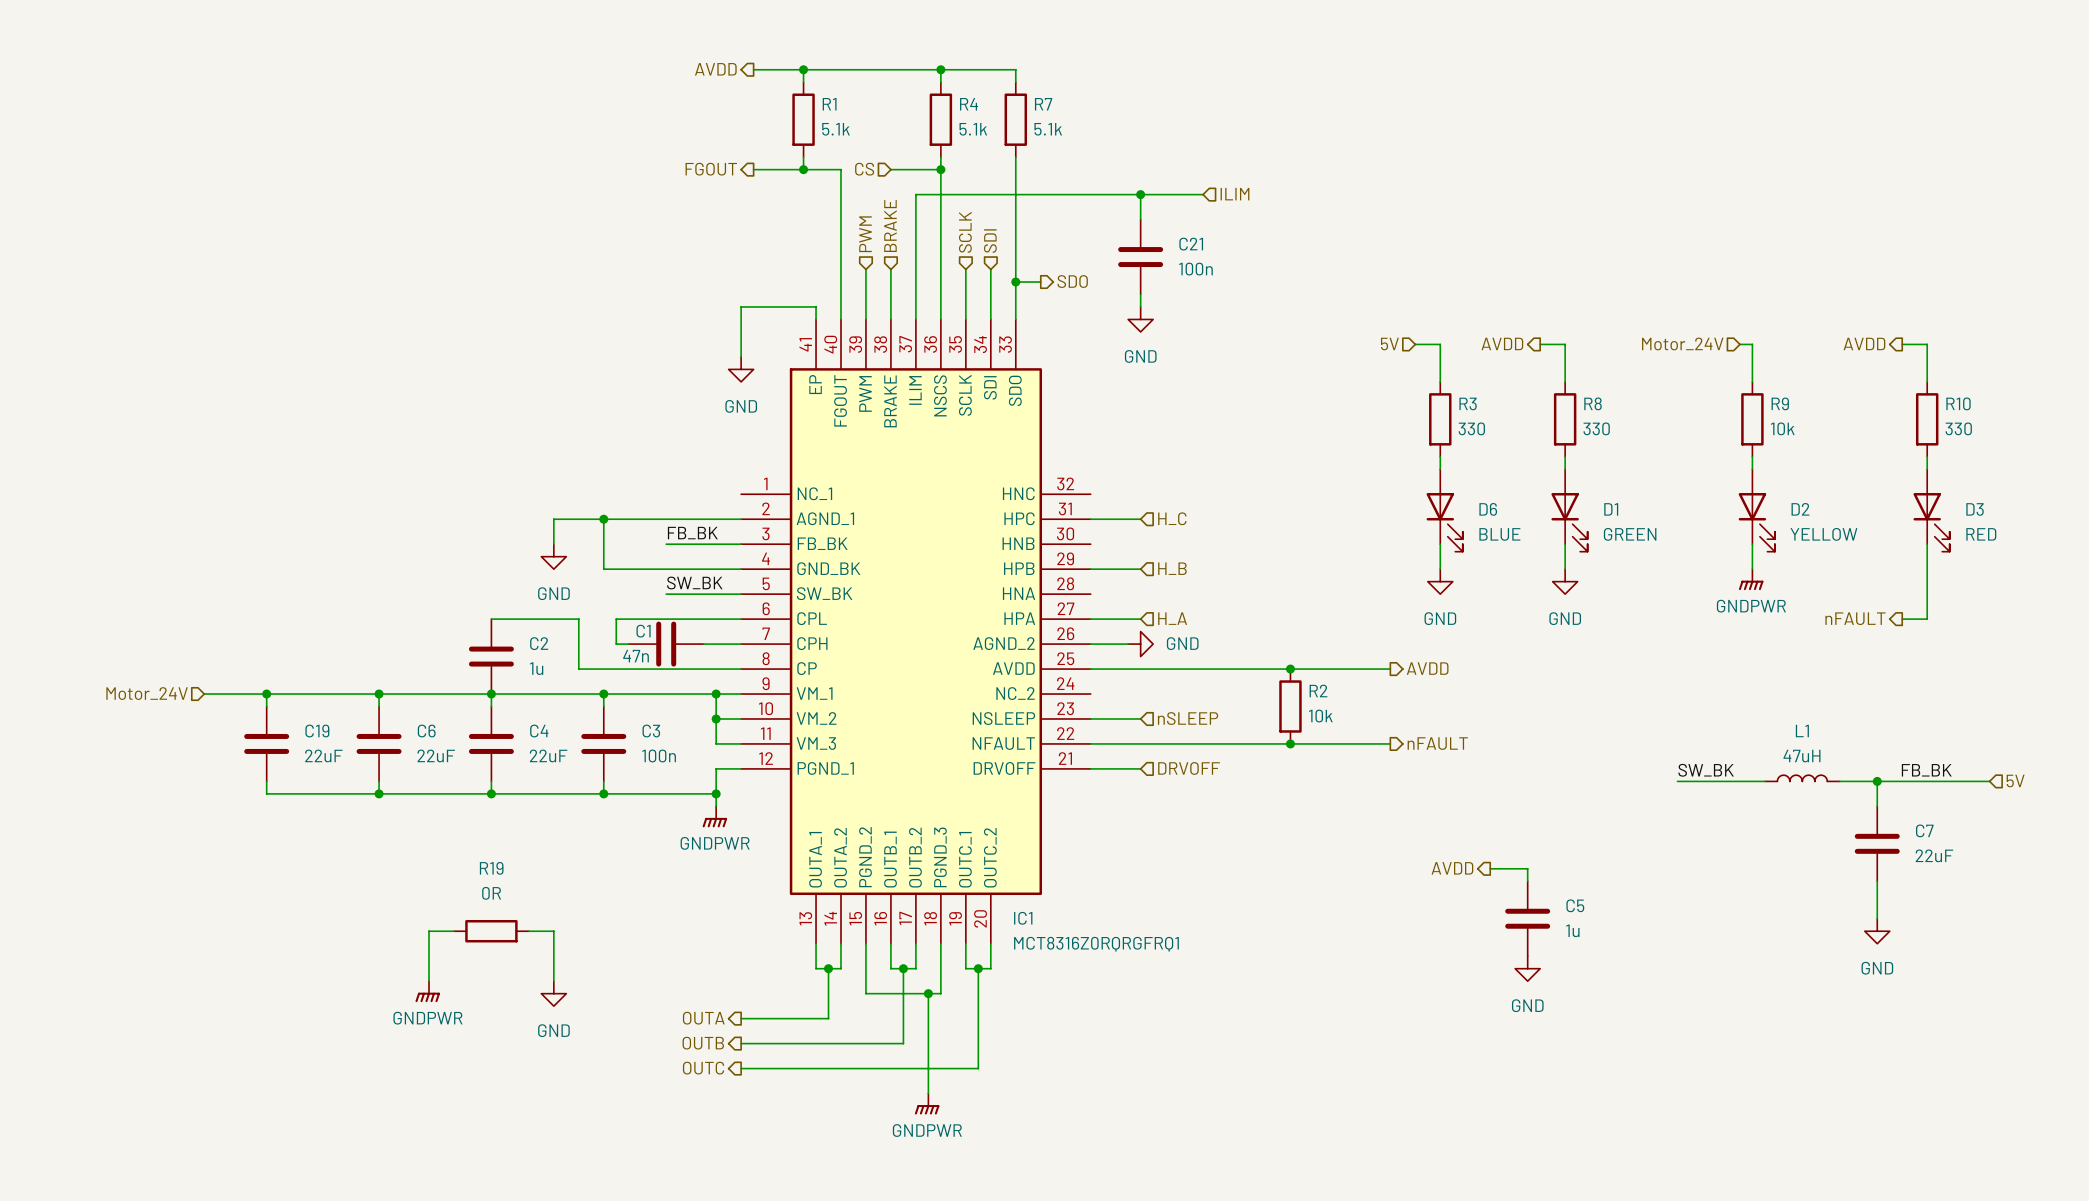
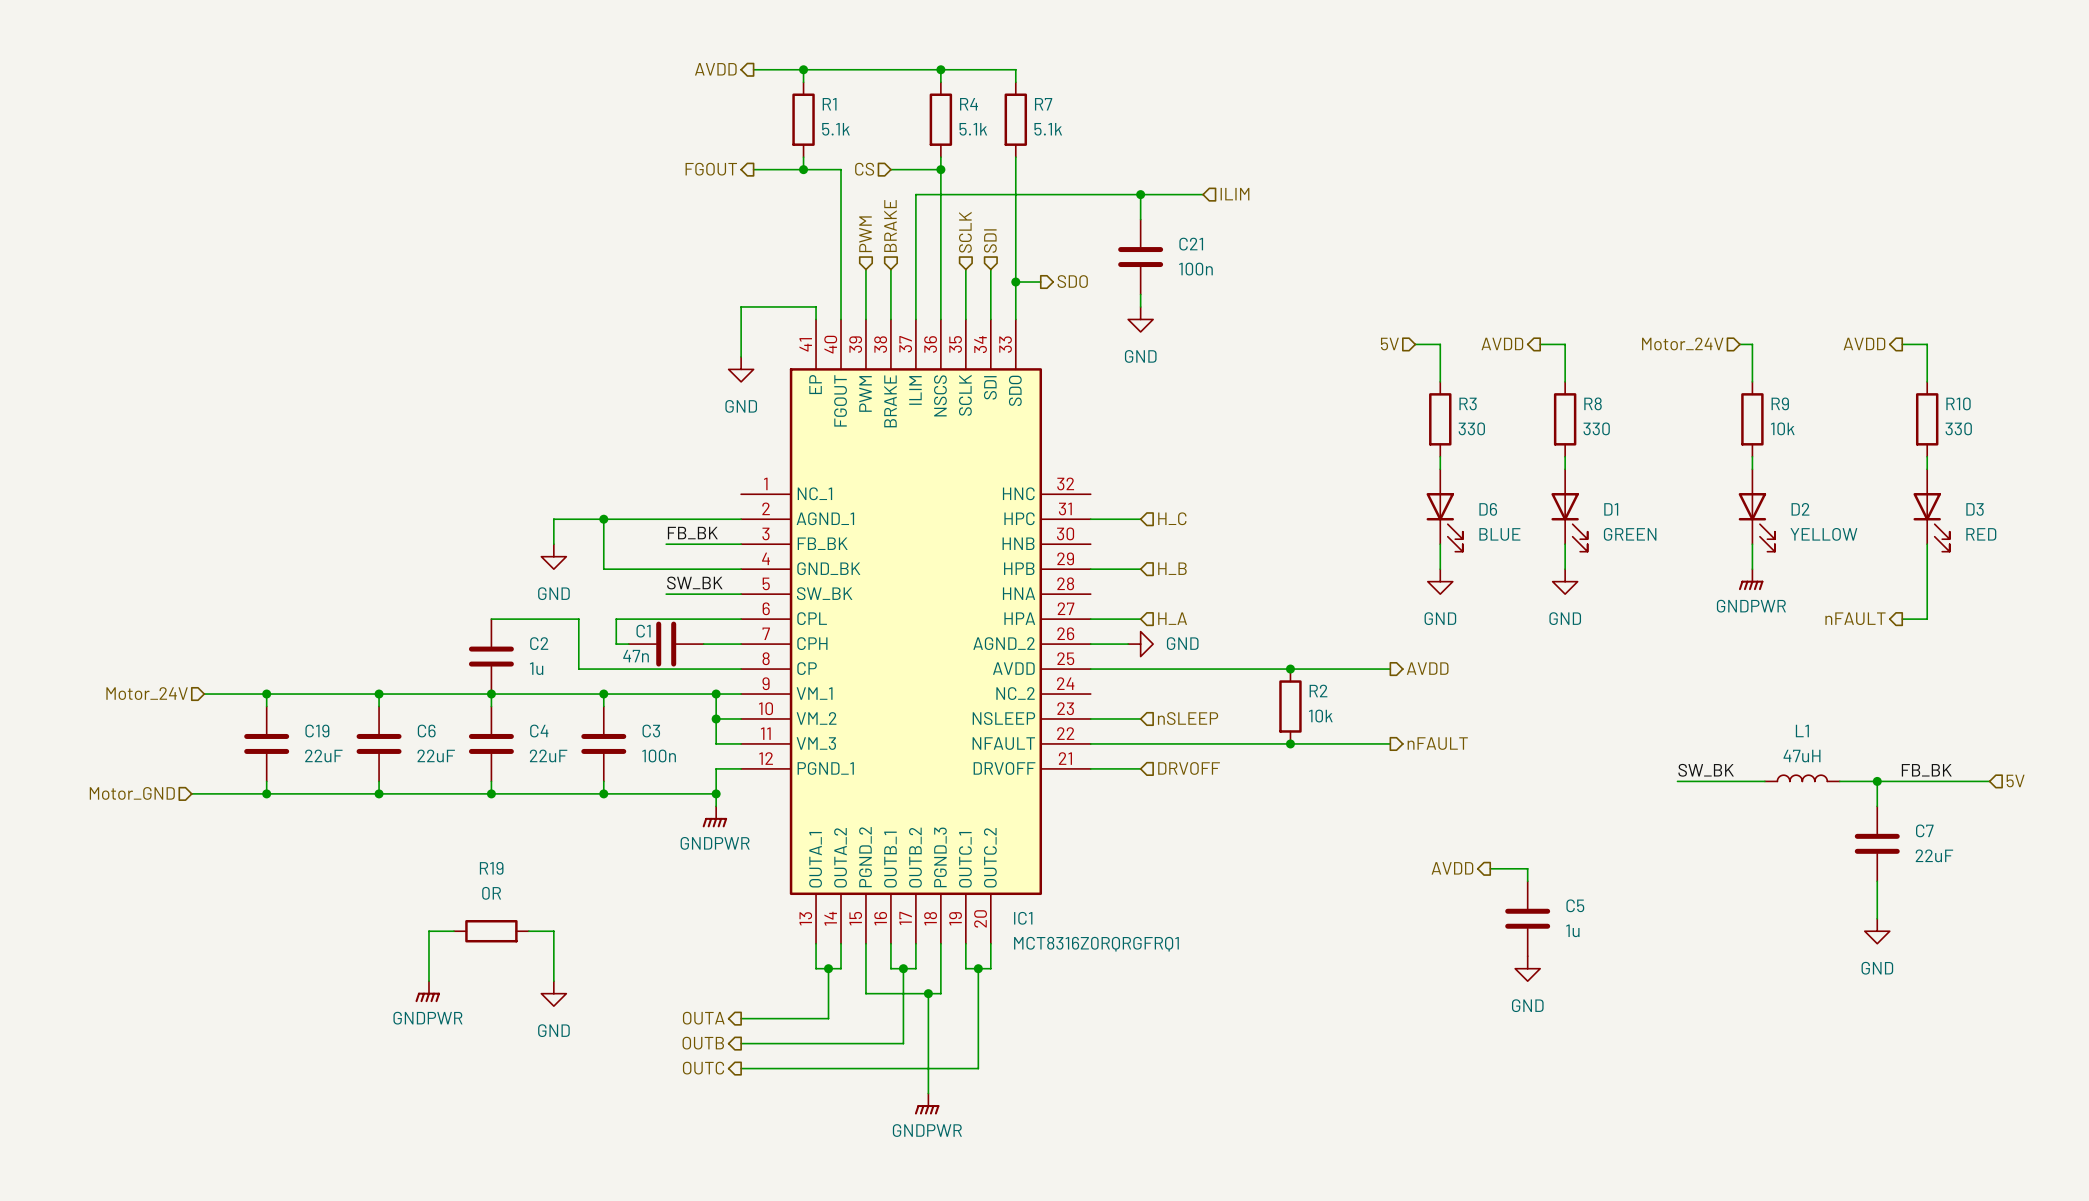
hierarchical label: none -> Motor_GND (132, 793)
wire: none -> (191, 793) (266, 793)
junction: none -> (266, 793)

